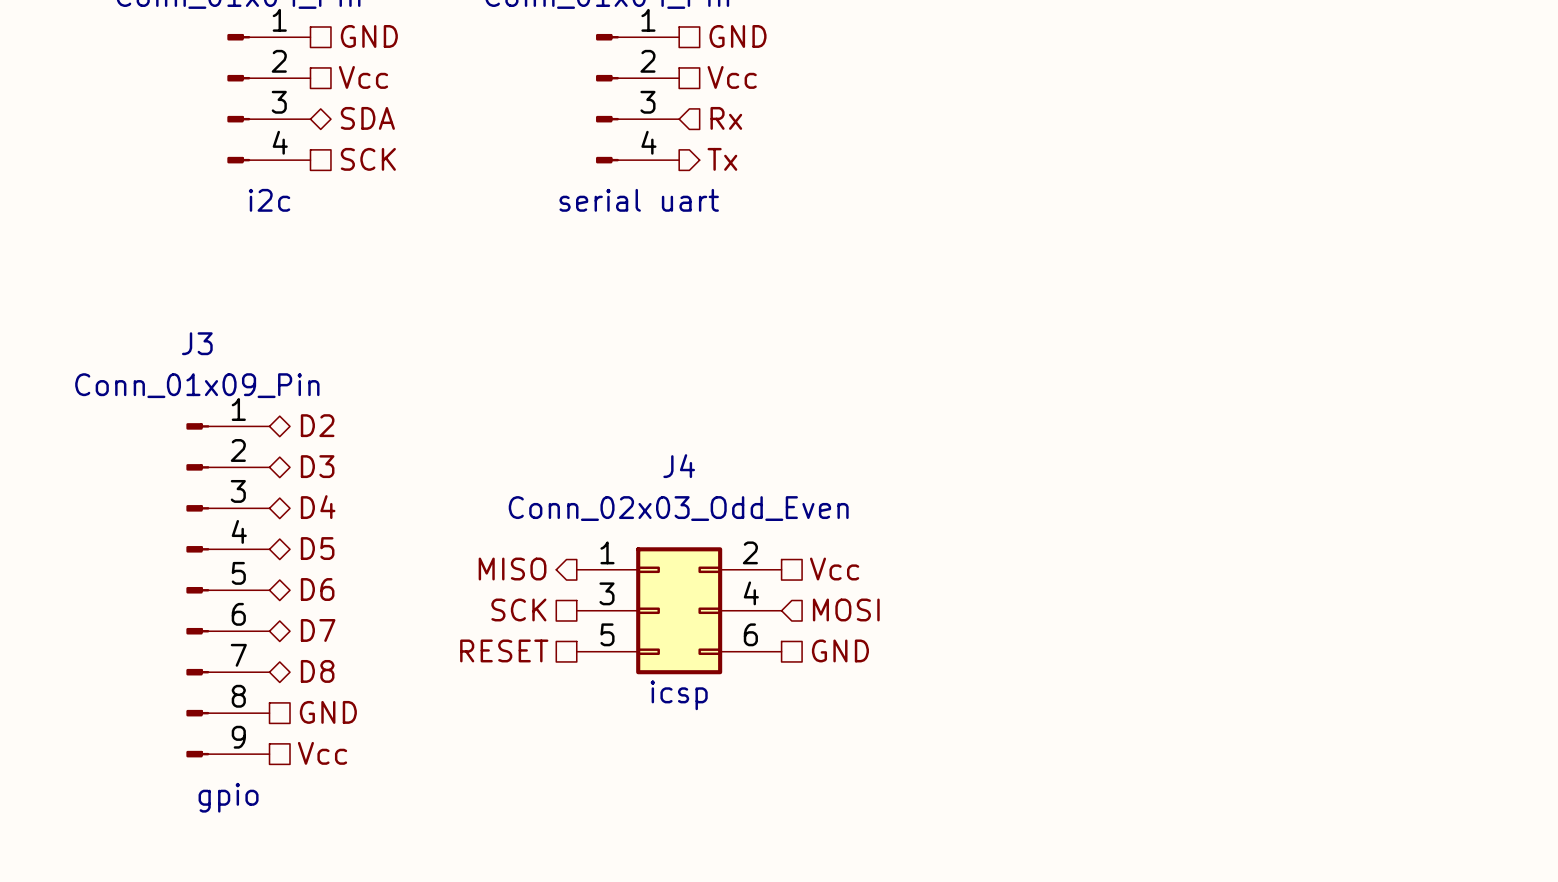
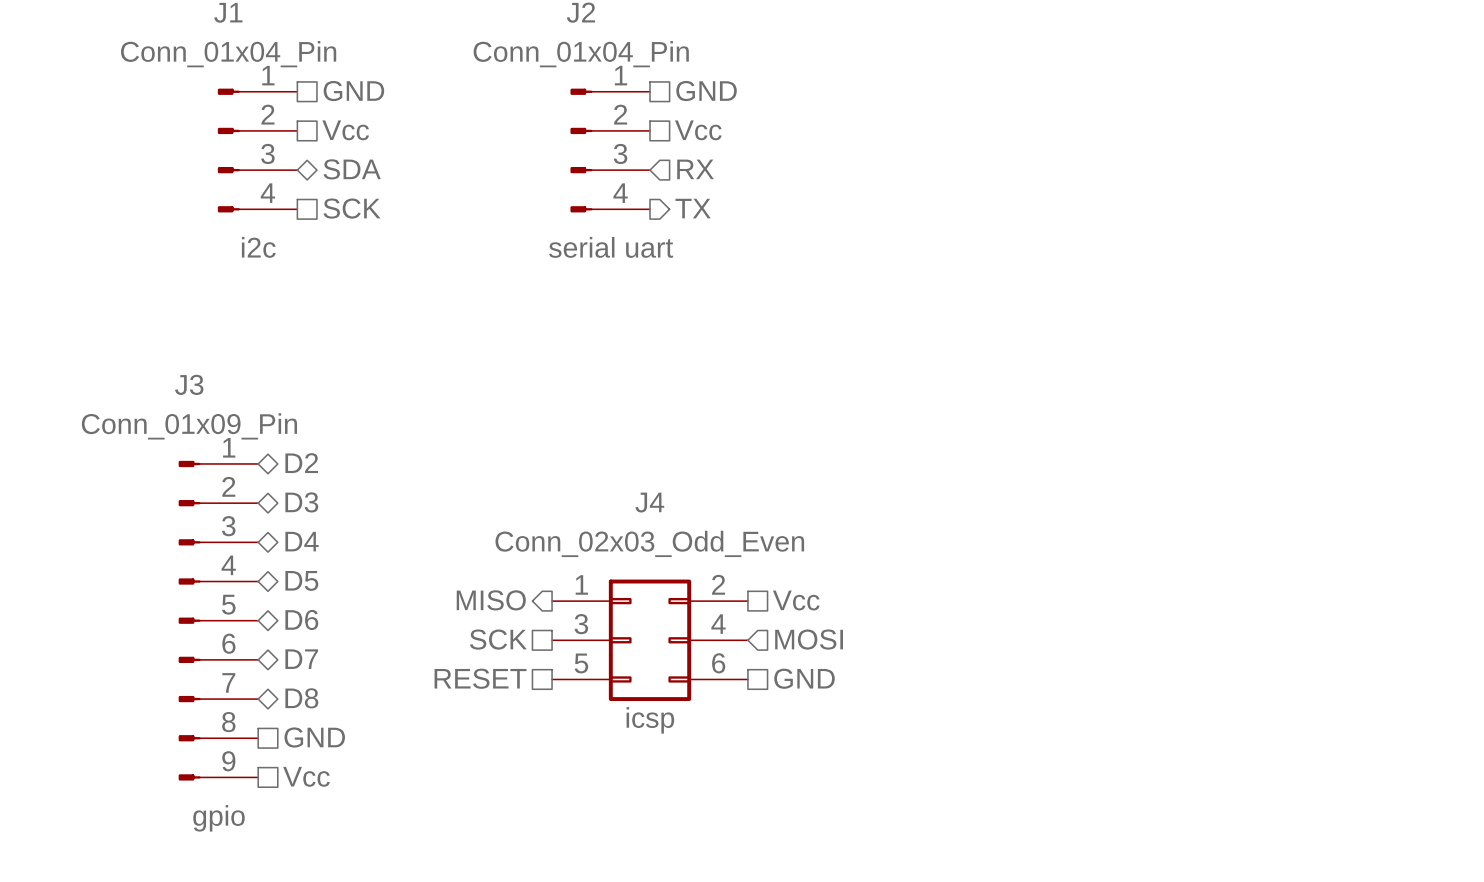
hierarchical label: Rx (726, 118) -> RX (695, 169)
hierarchical label: Tx (722, 159) -> TX (693, 208)

